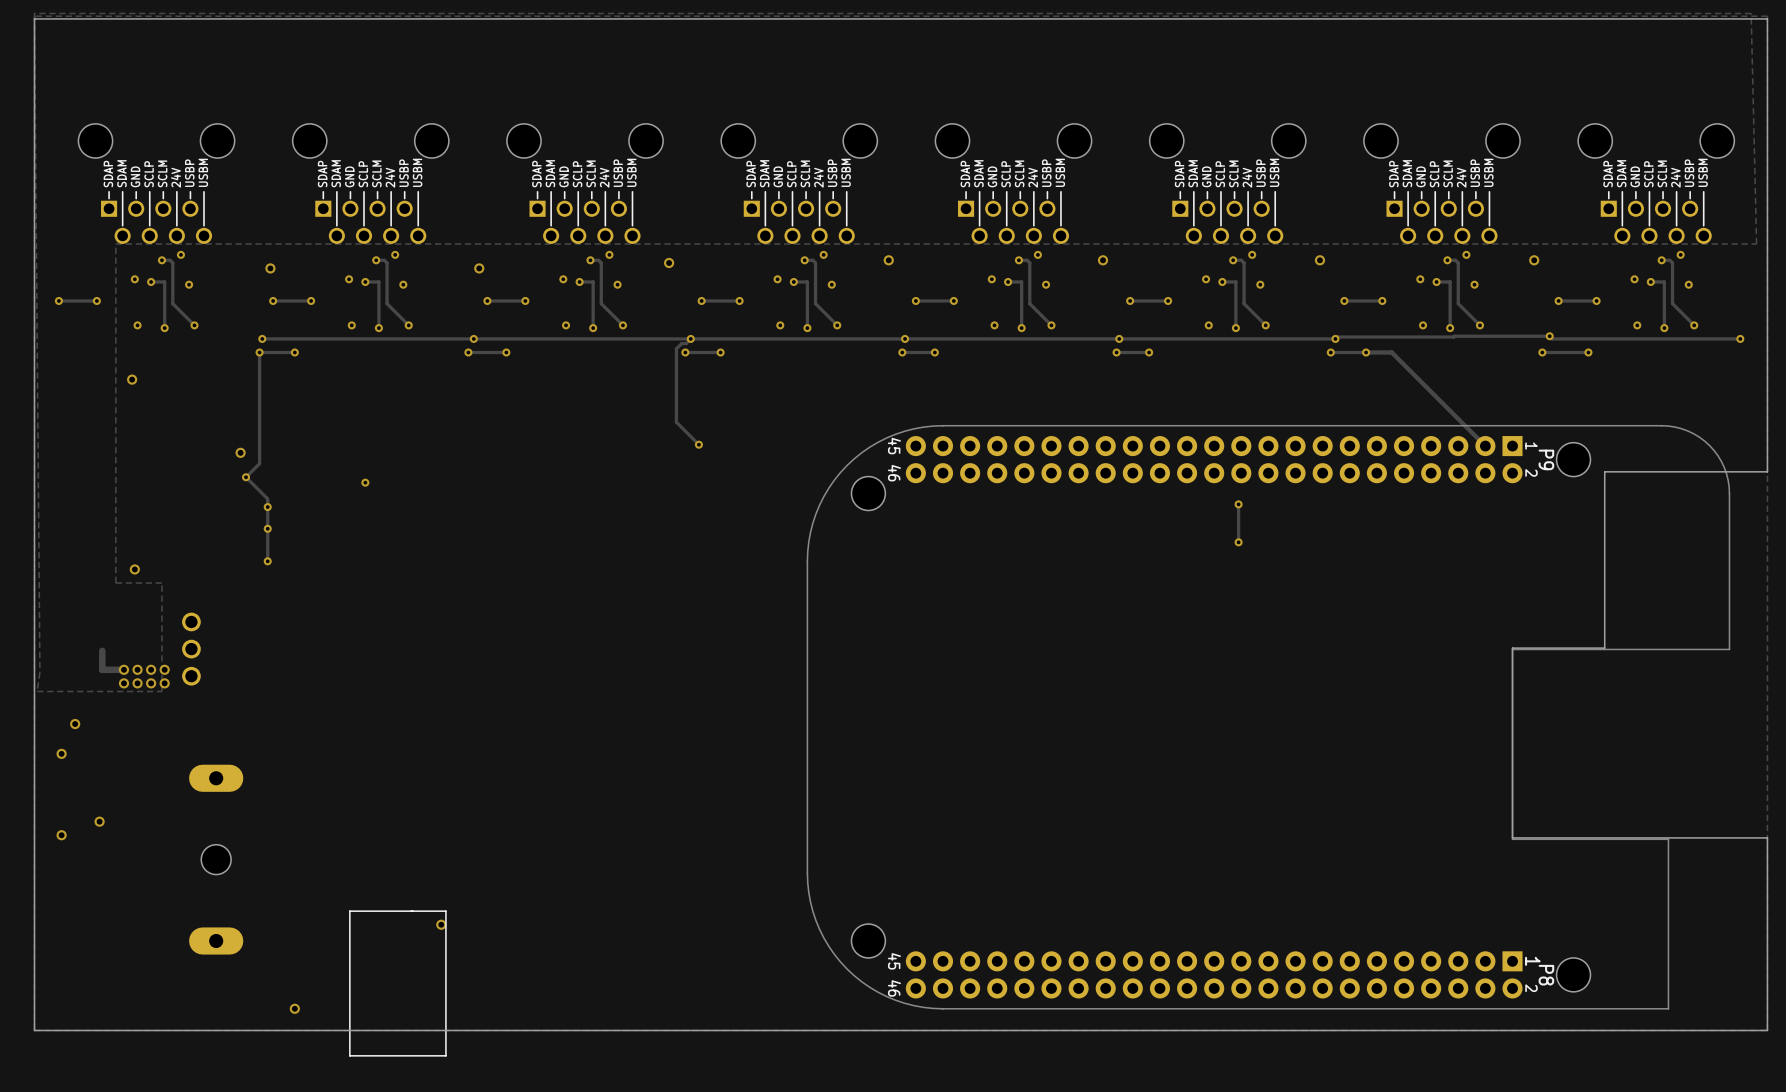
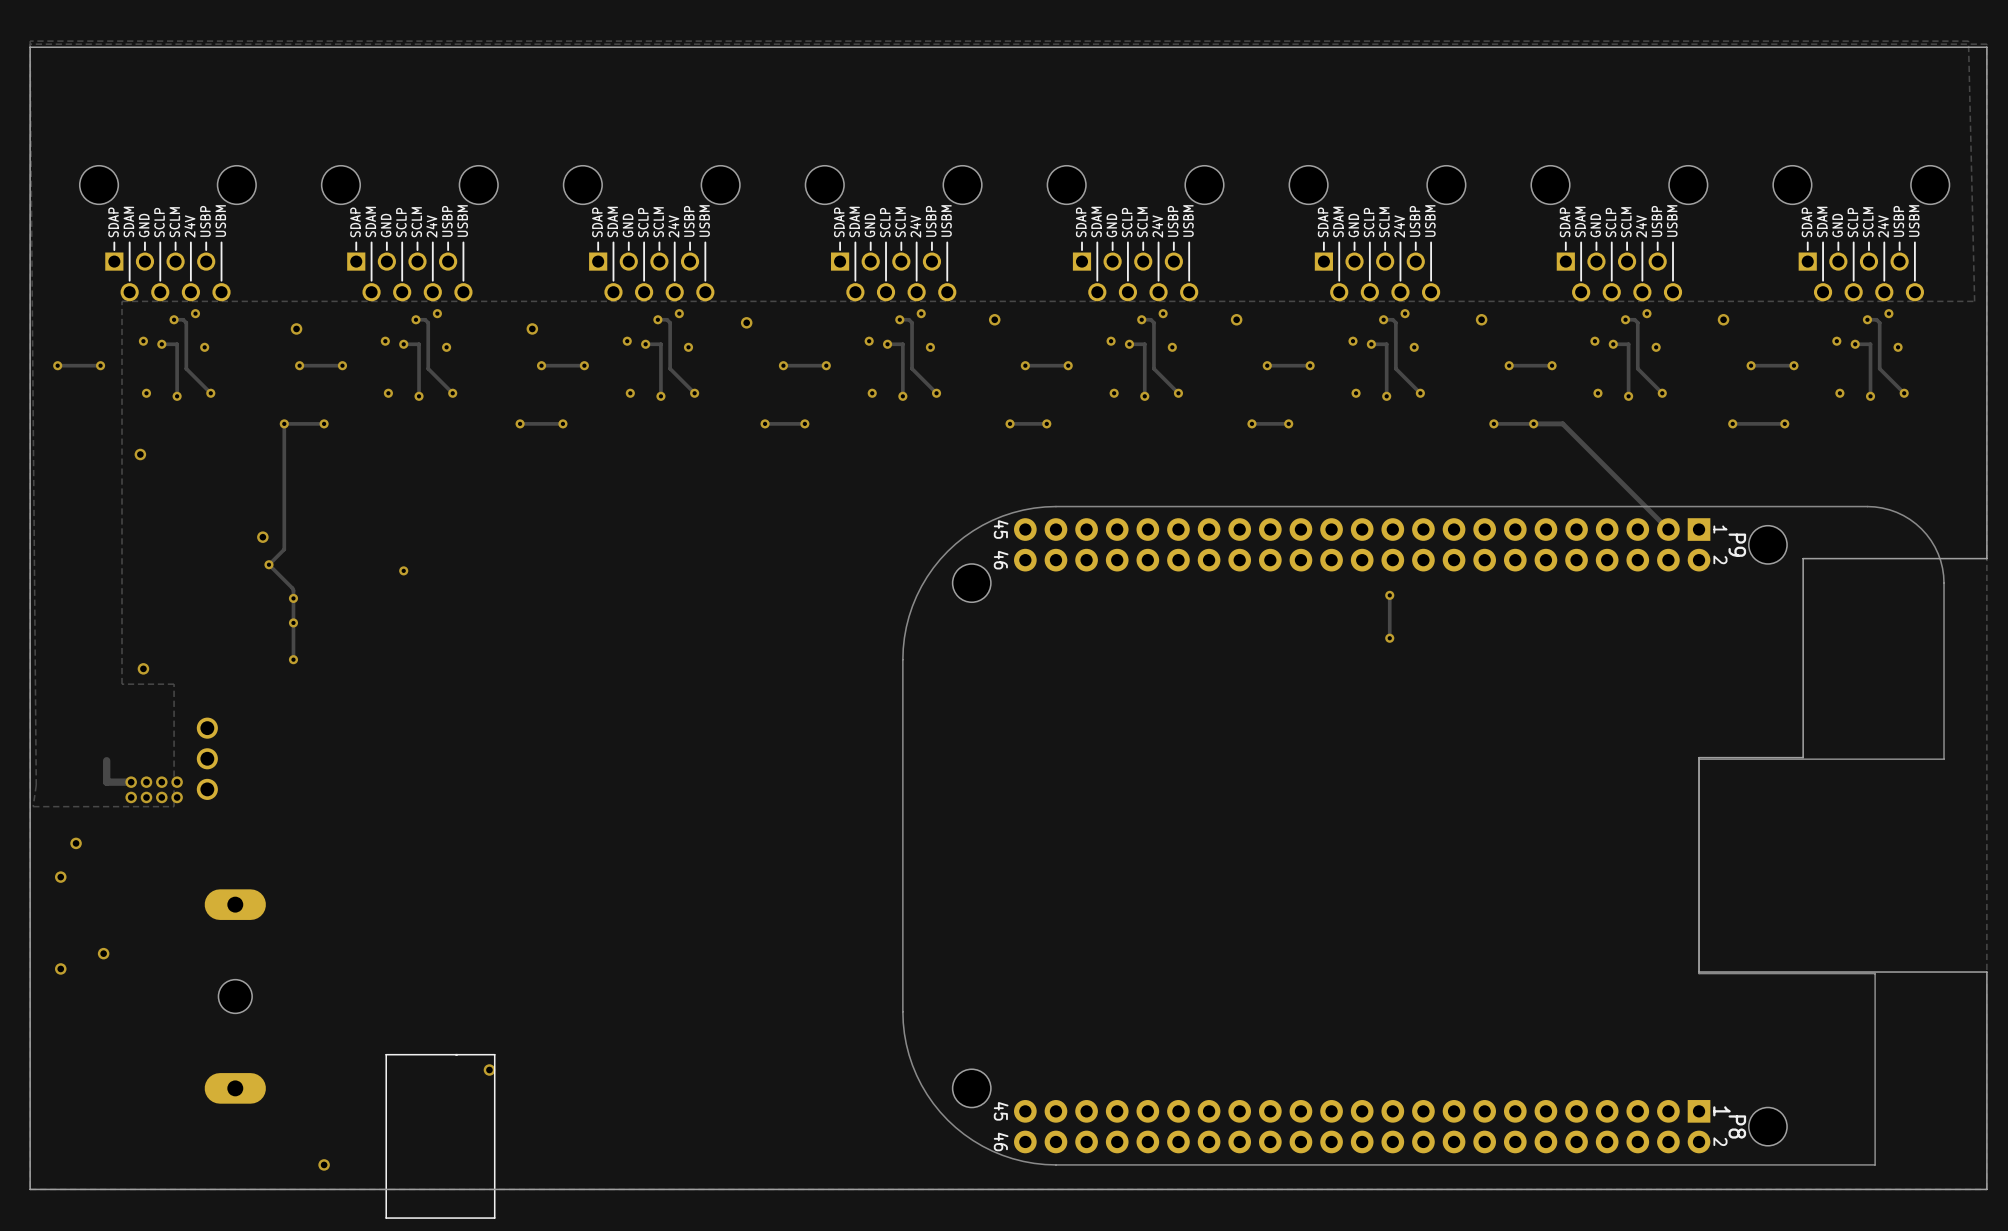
via: (1549, 336) -> none
via: (262, 338) -> none
via: (473, 338) -> none
track: (690, 338) (676, 348) (676, 422) (698, 444) -> none
via: (690, 338) -> none
via: (905, 338) -> none
via: (1119, 338) -> none
via: (1335, 338) -> none
track: (1740, 338) (1552, 338) (1549, 336) (1337, 337) (1335, 338) (262, 338) -> none
via: (1740, 338) -> none
via: (698, 444) -> none

